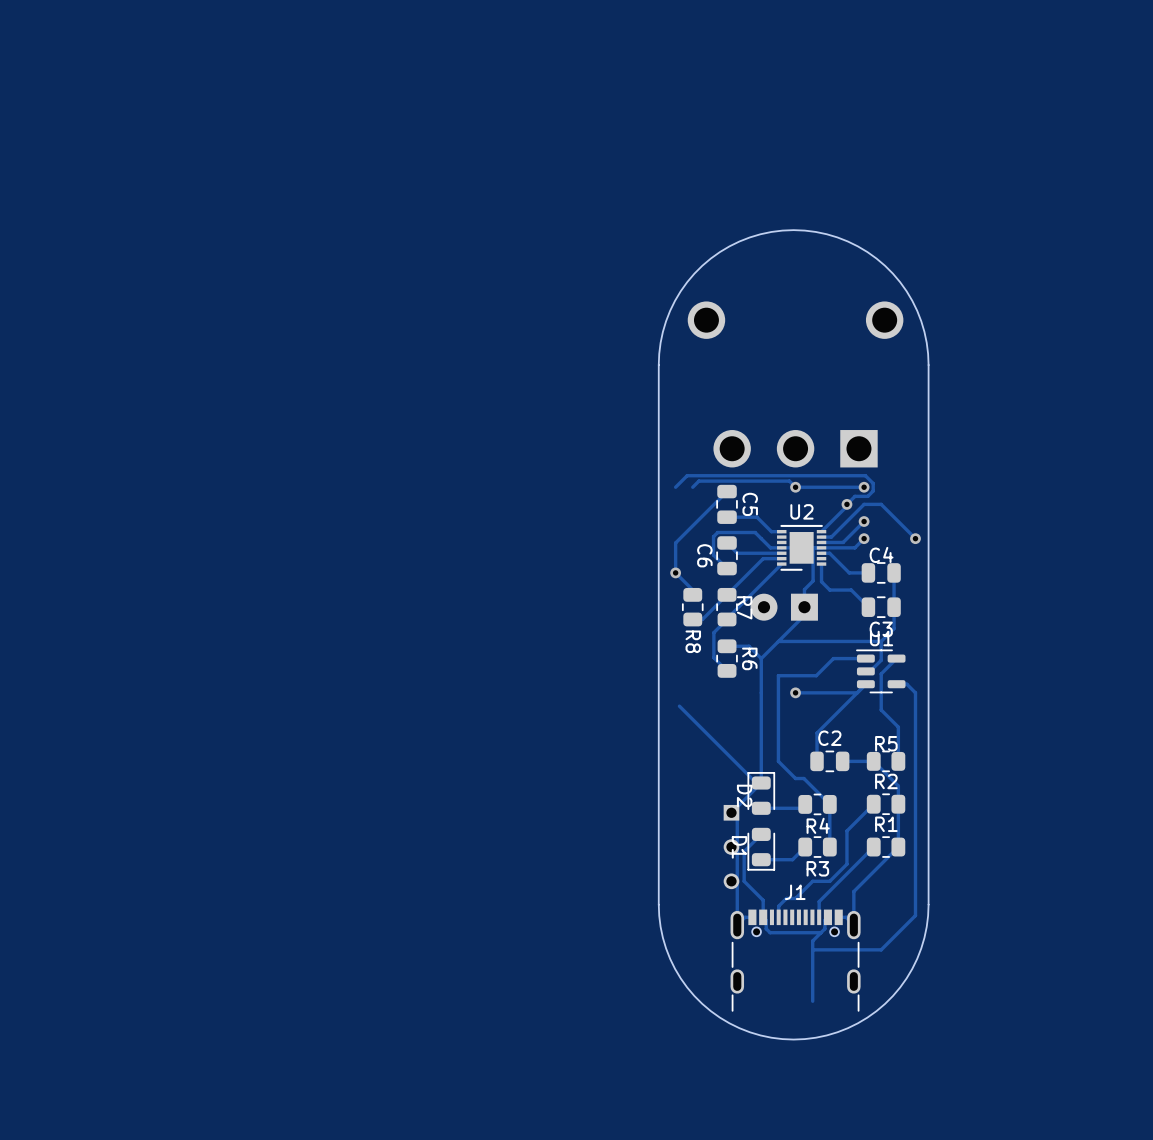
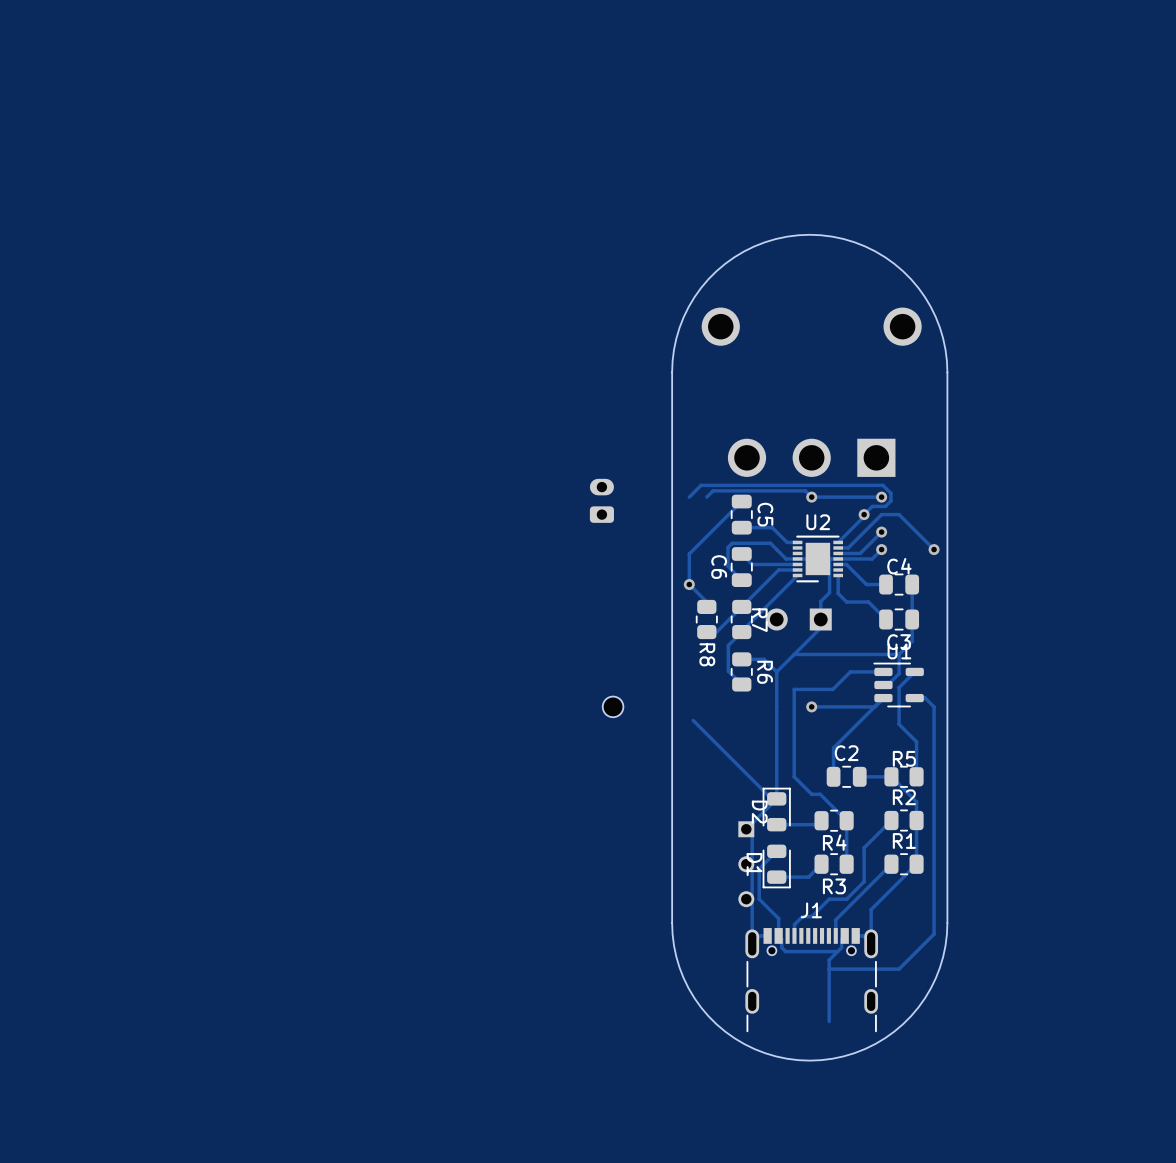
part: none -> (601, 500)
part footprint: [750, 593, 818, 621] -> [765, 608, 832, 631]
part: none -> (613, 706)

